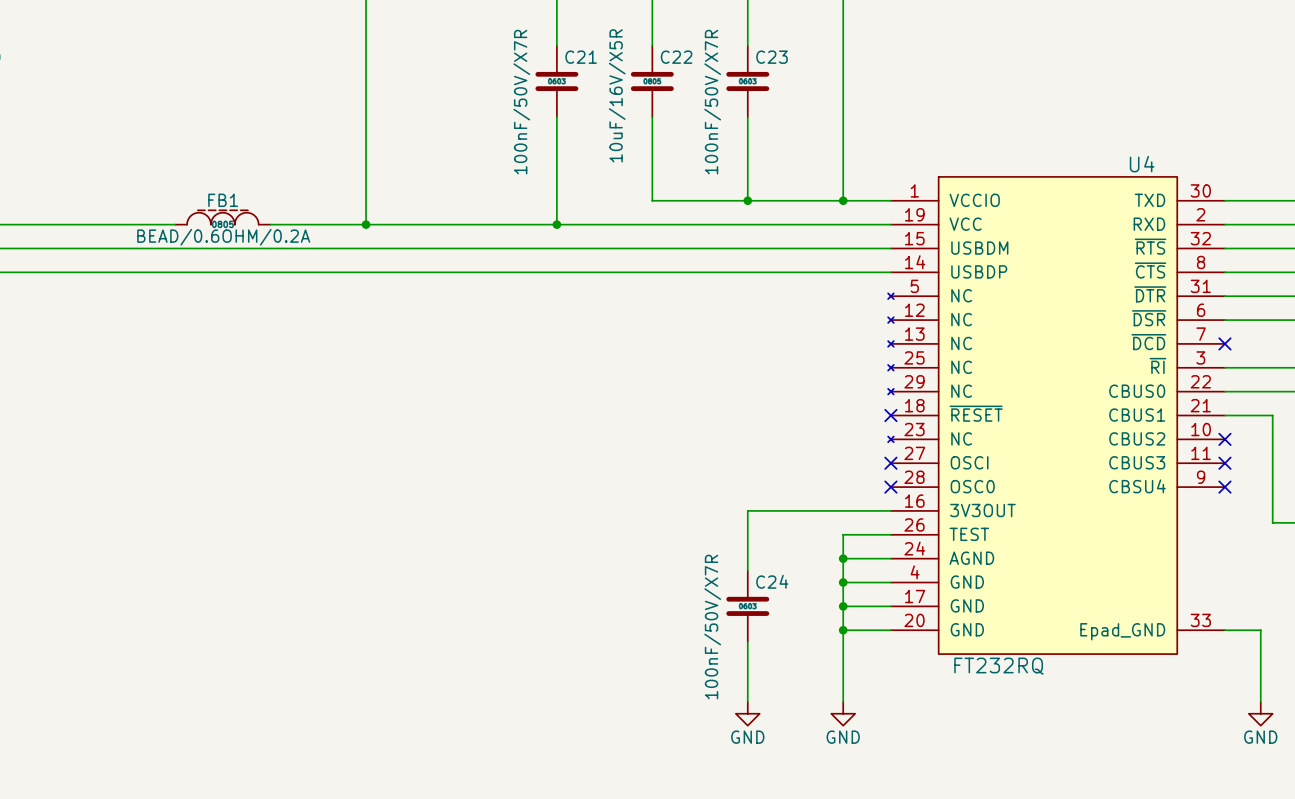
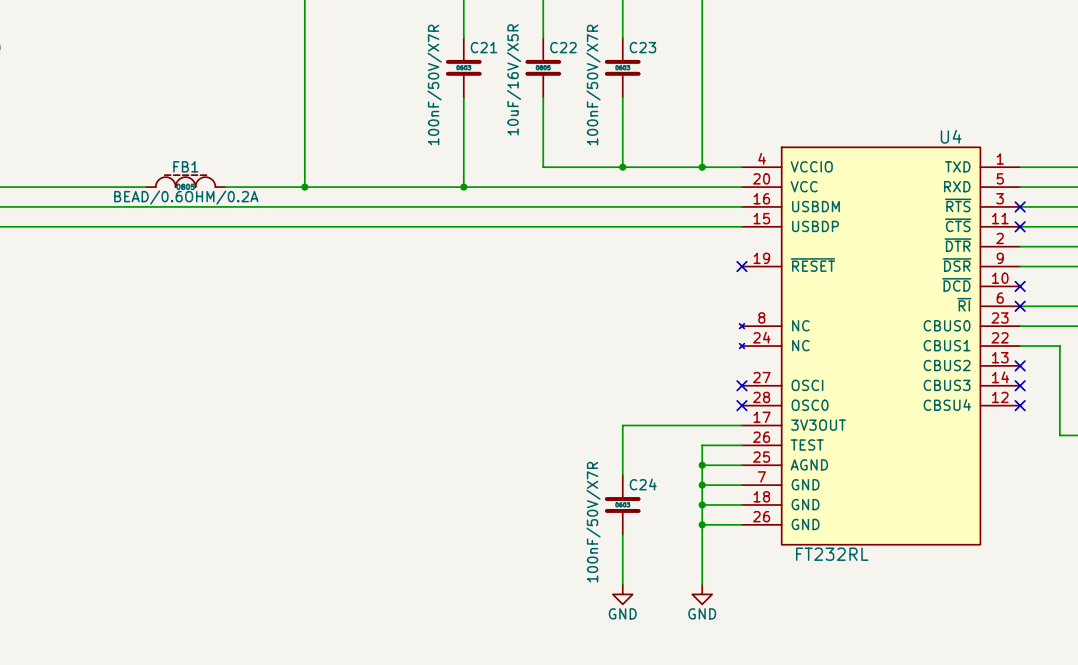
U4 symbol: [888, 176, 1225, 655] -> [739, 147, 1021, 545]
no-connect mark: none -> (1020, 206)
no-connect mark: none -> (1020, 226)
no-connect mark: none -> (741, 266)
no-connect mark: none -> (1020, 306)
no-connect mark: (890, 415) -> none
wire: (1224, 630) (1260, 630) (1260, 701) -> none
U4 value: FT232RQ (998, 666) -> FT232RL (832, 554)
power symbol: GND (1260, 713) -> none

